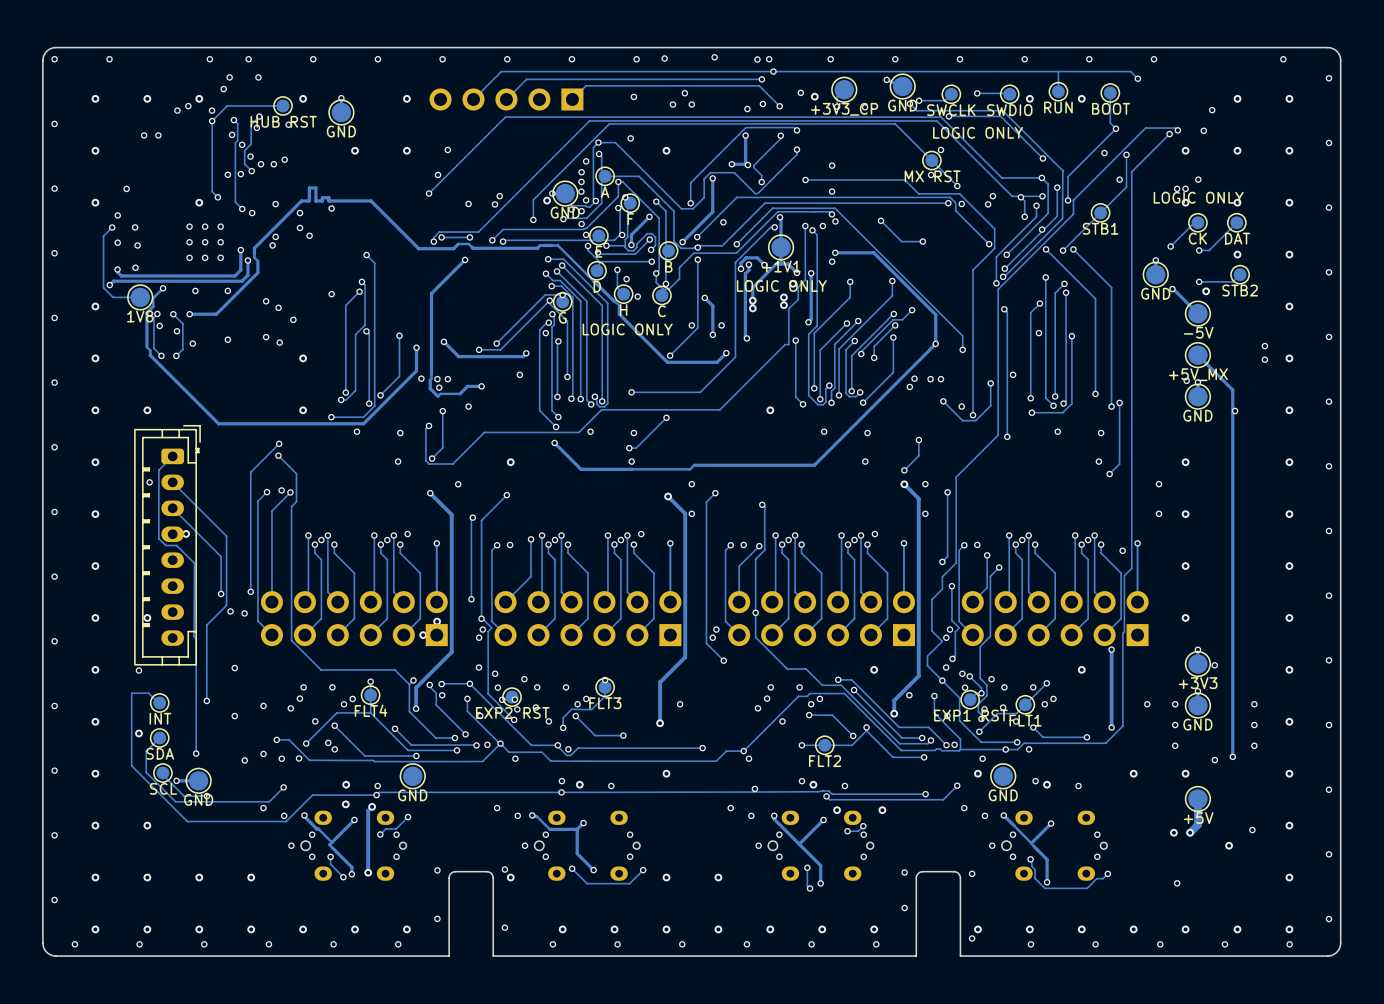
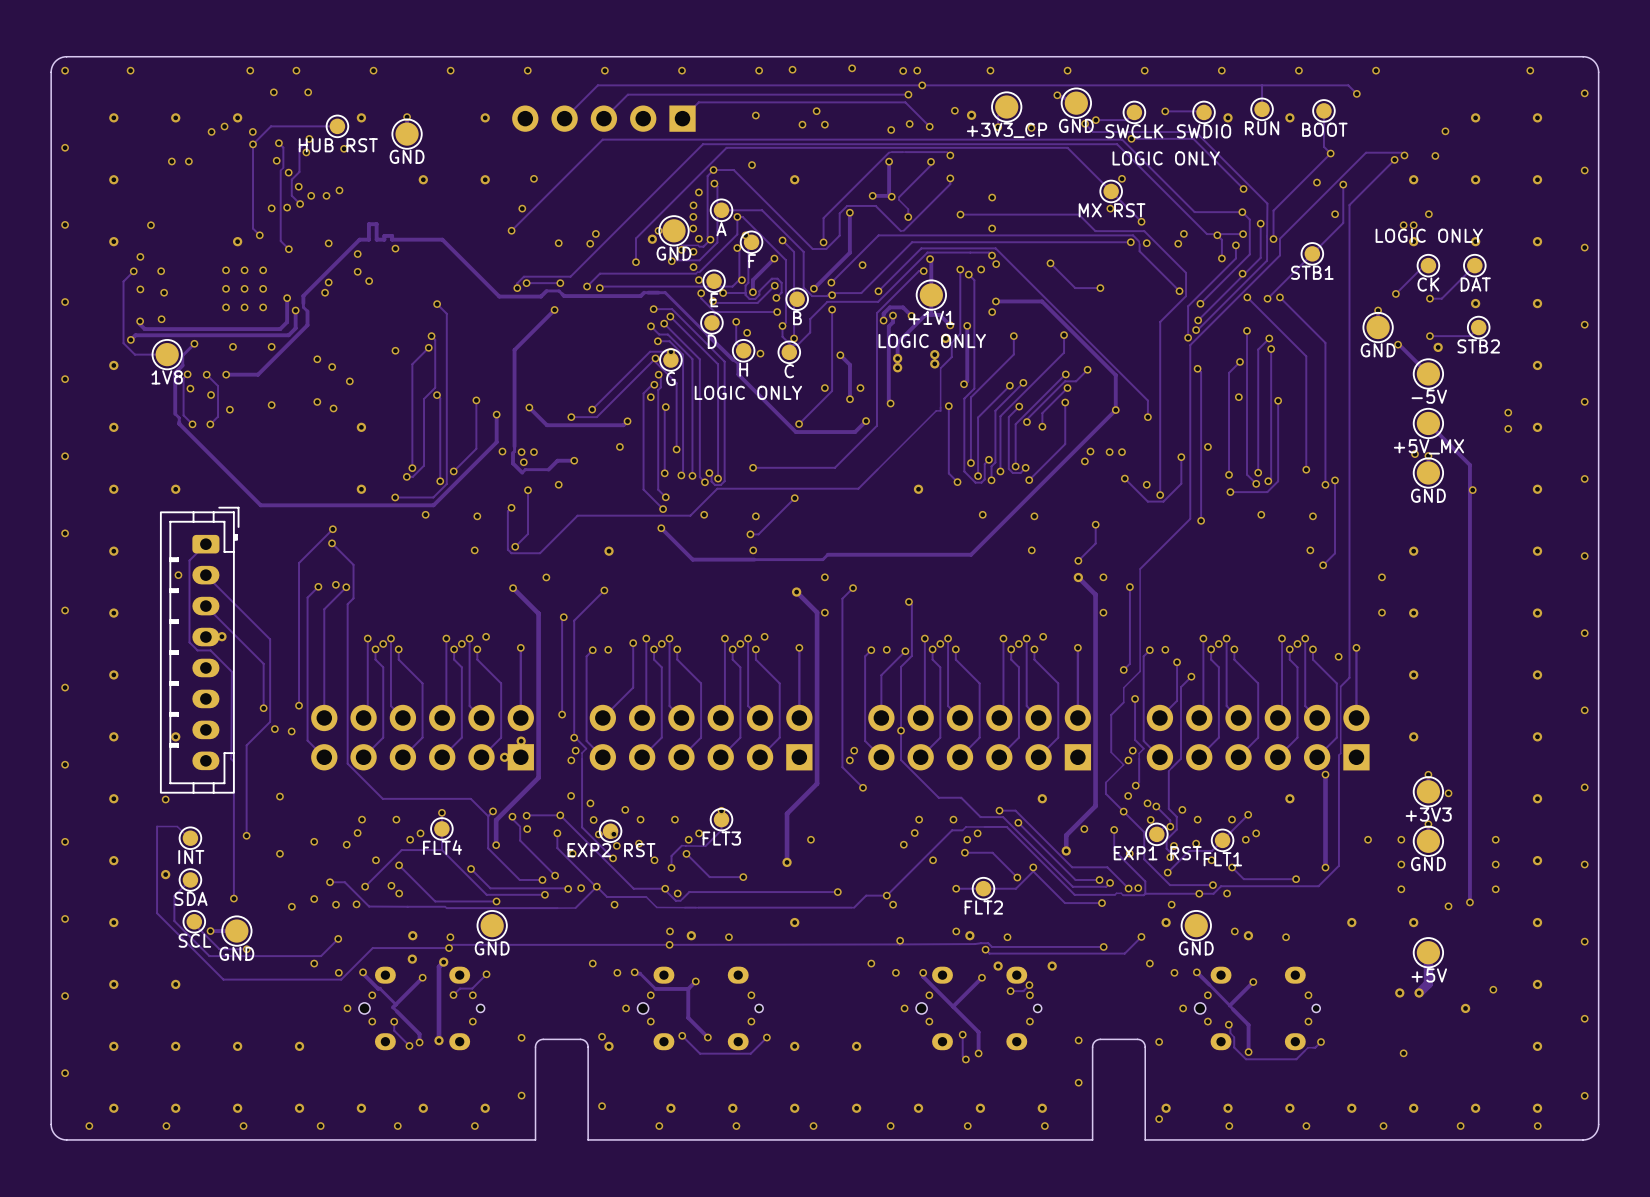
via: (223, 89) -> none
via: (252, 213) -> none

